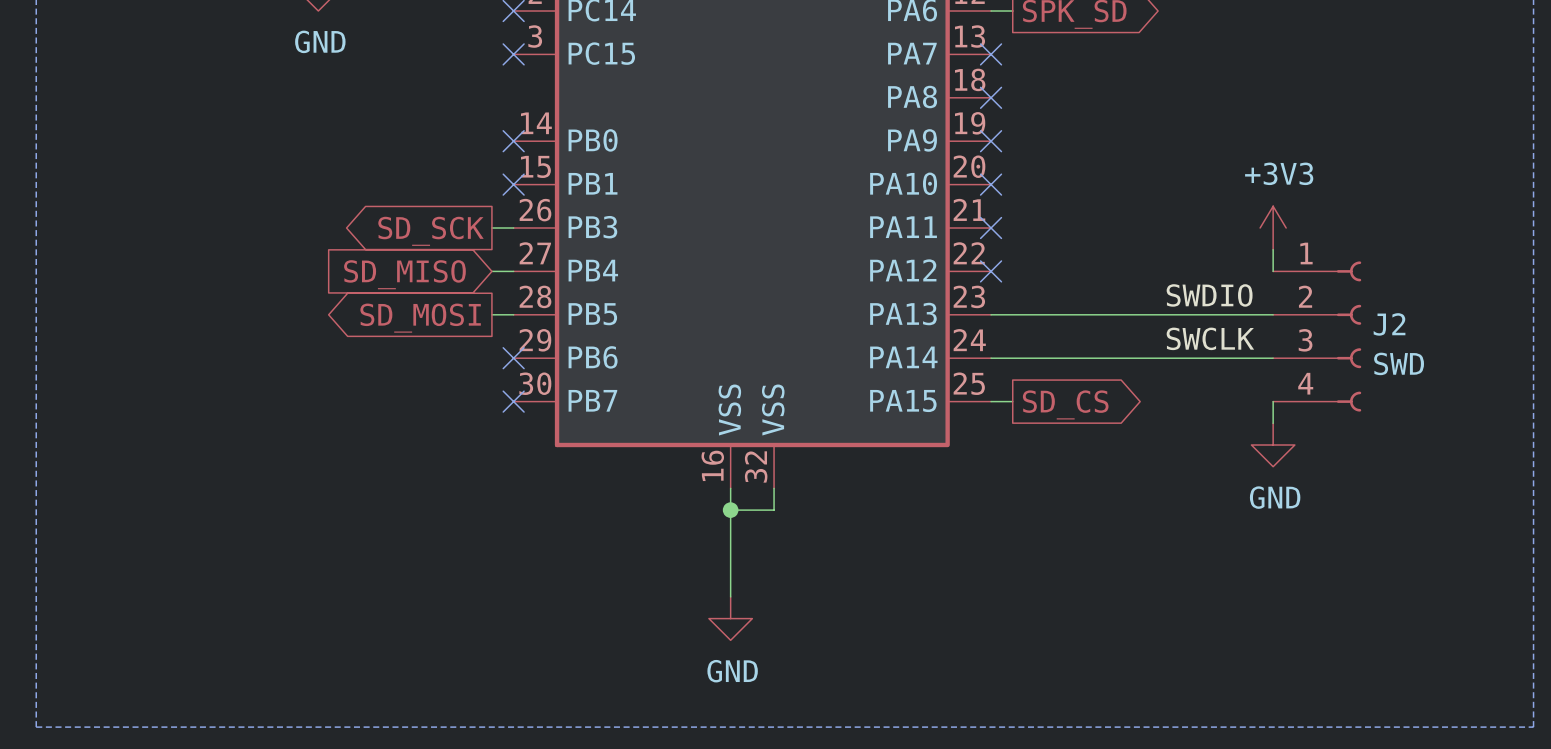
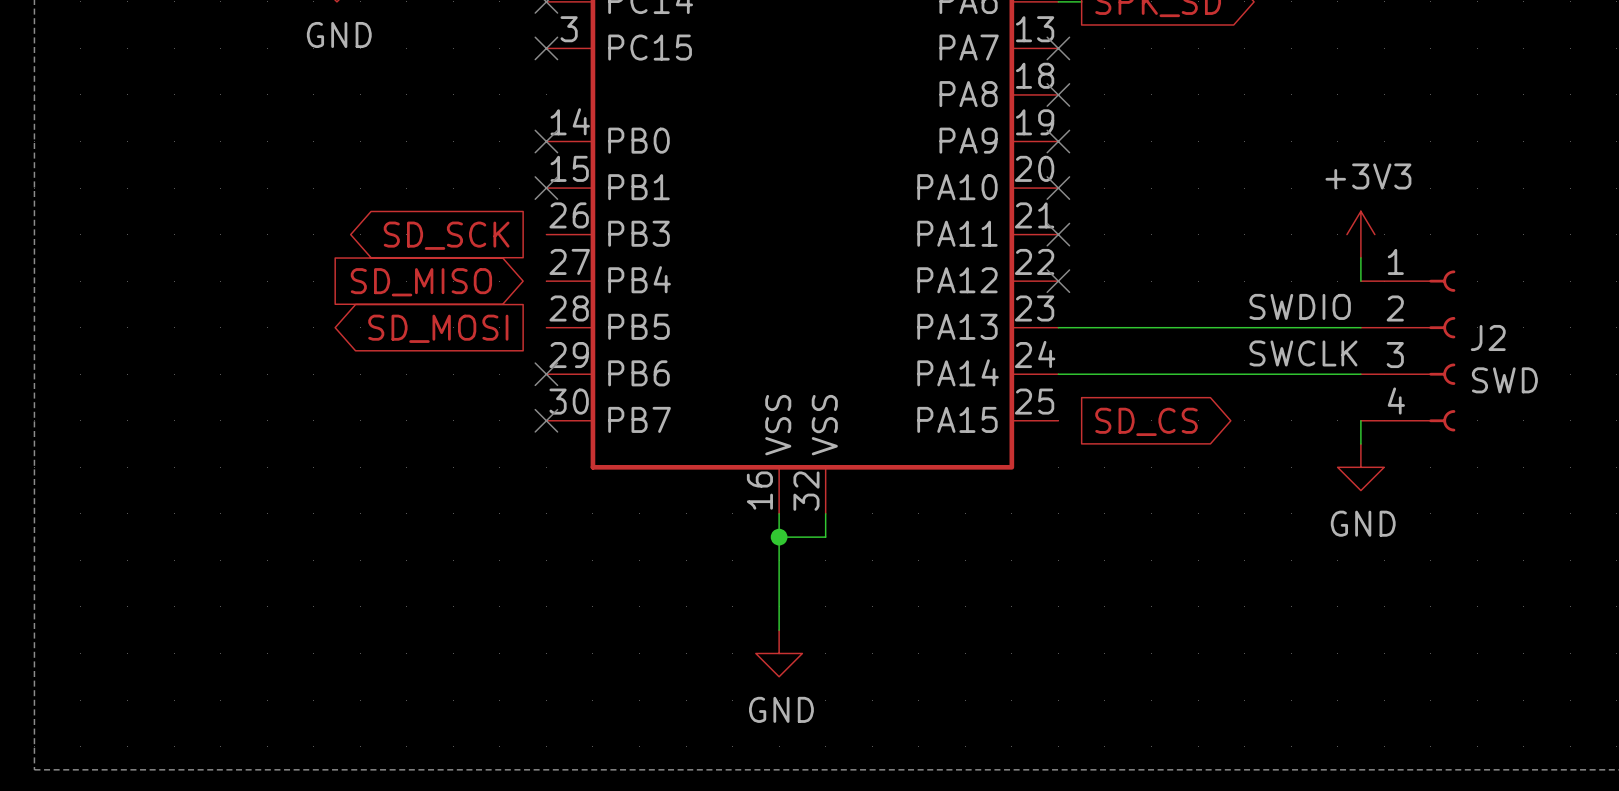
wire: (491, 228) (513, 228) -> none
wire: (491, 271) (513, 271) -> none
wire: (491, 314) (513, 314) -> none
wire: (991, 401) (1012, 401) -> none

